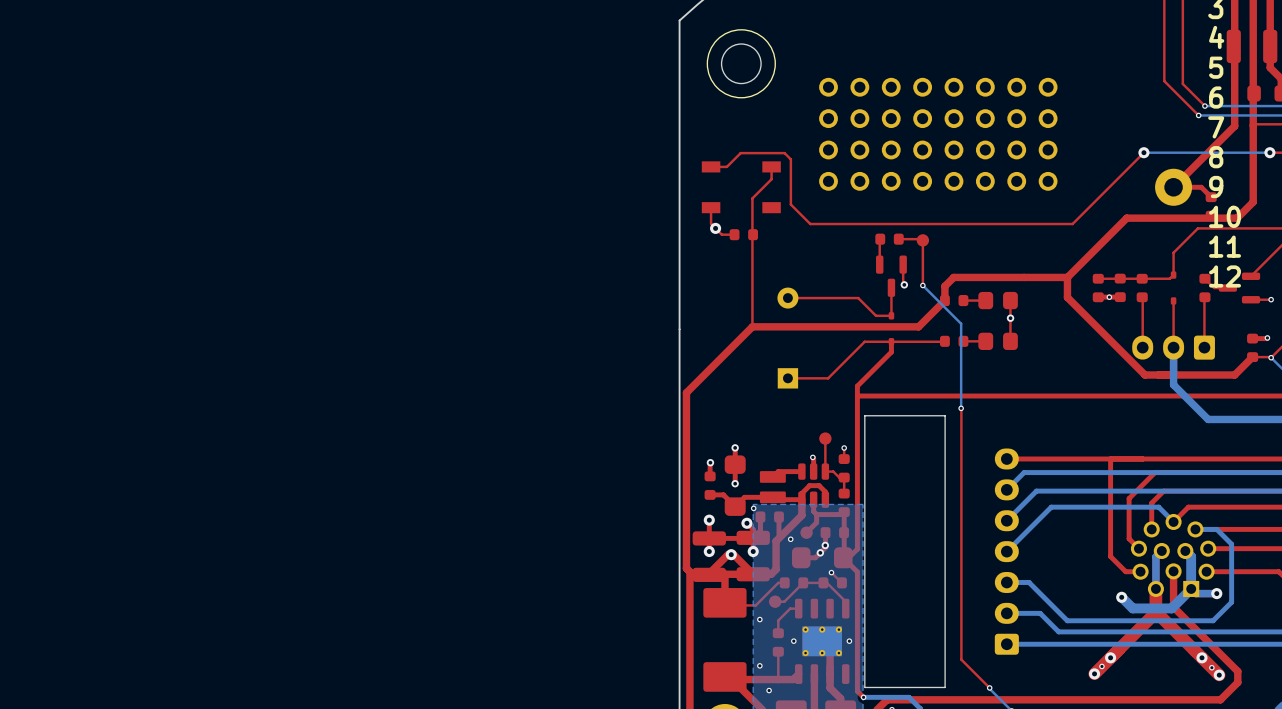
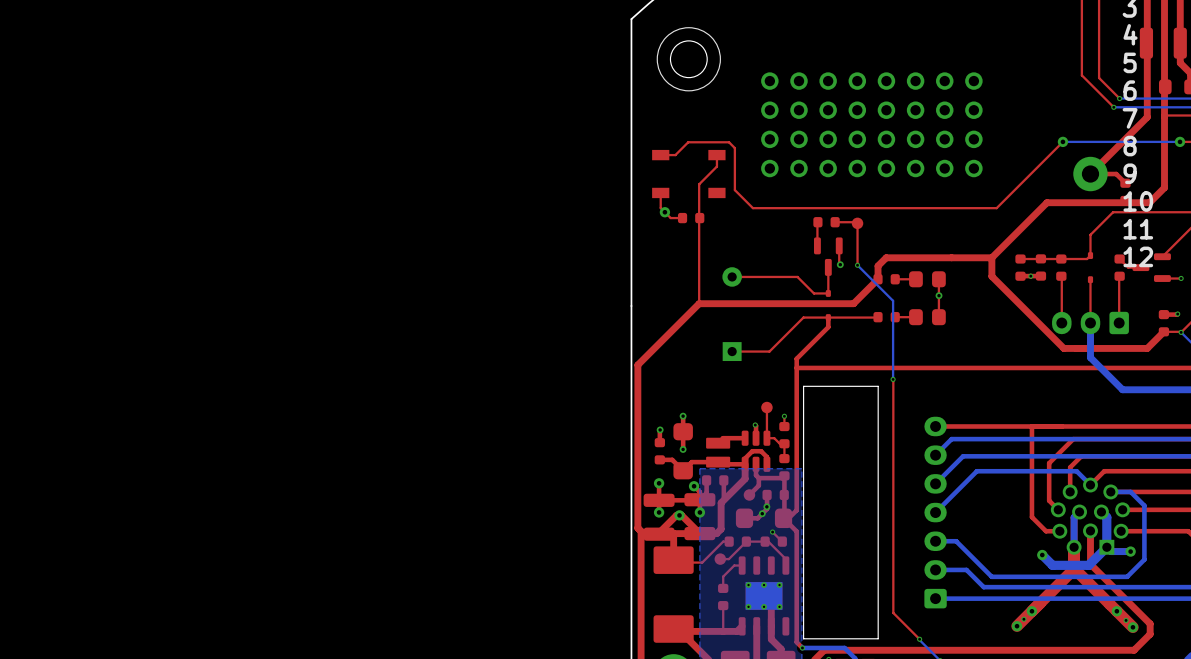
via: (753, 508) -> none
via: (790, 539) -> none
via: (759, 619) -> none
via: (793, 641) -> none
via: (849, 641) -> none
via: (759, 665) -> none
via: (769, 690) -> none

